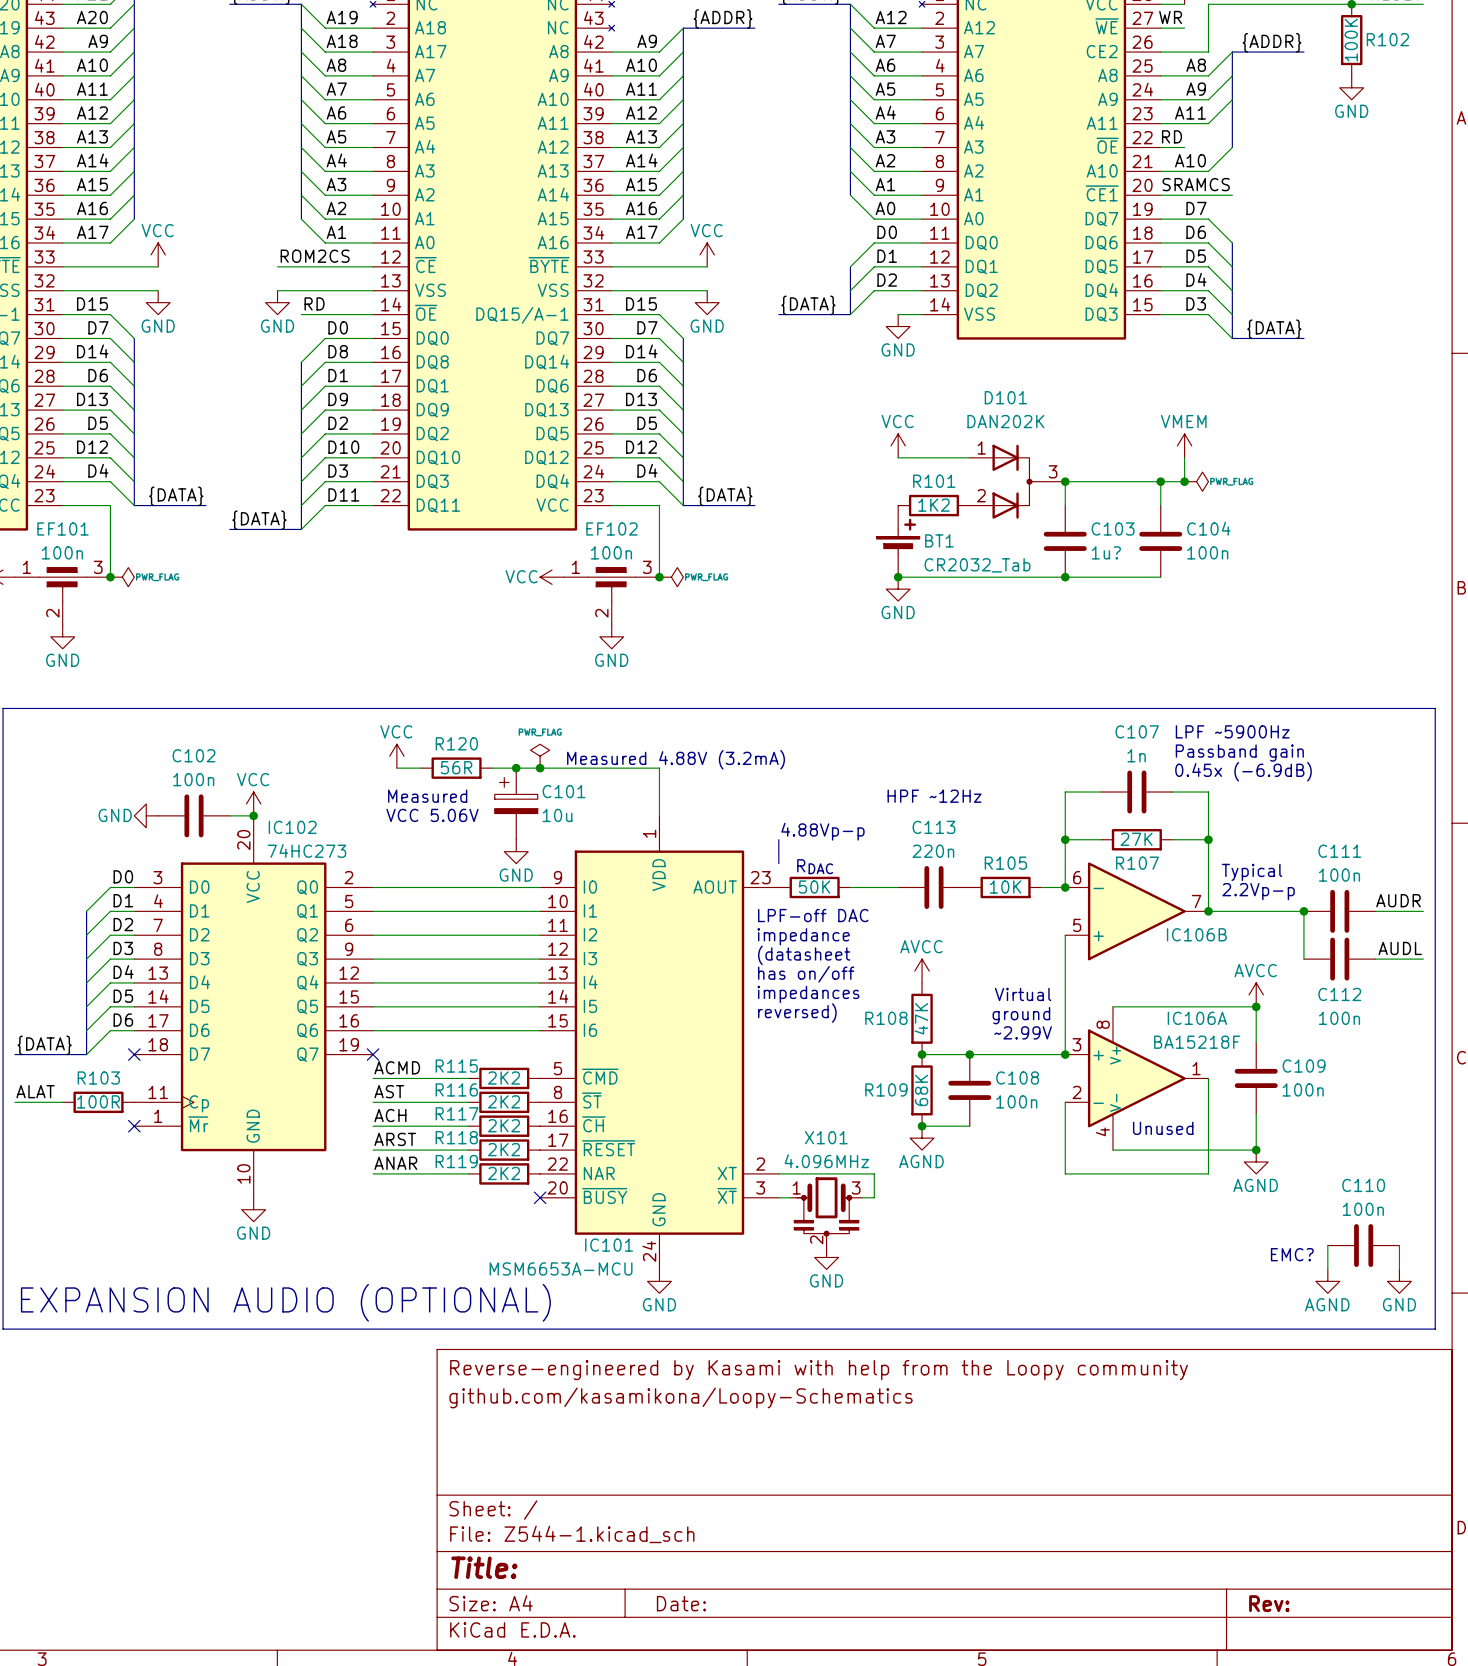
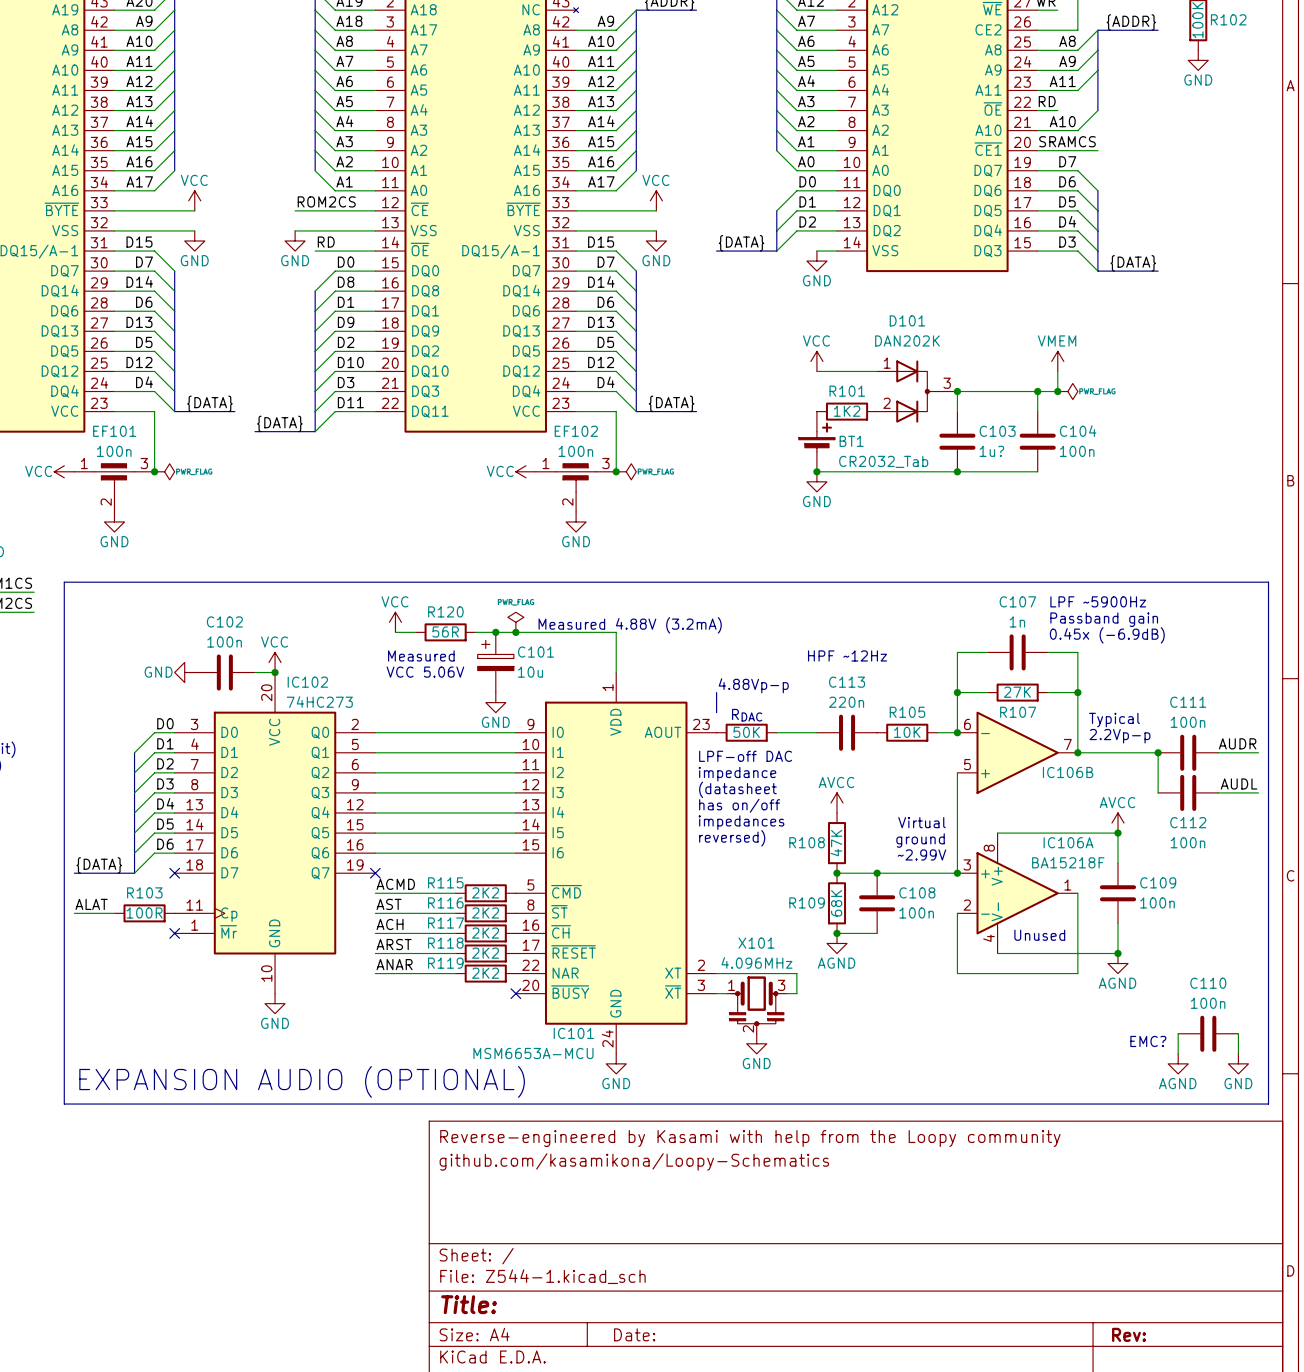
part symbol: [1113, 1006, 1114, 1151] -> [997, 833, 998, 954]

